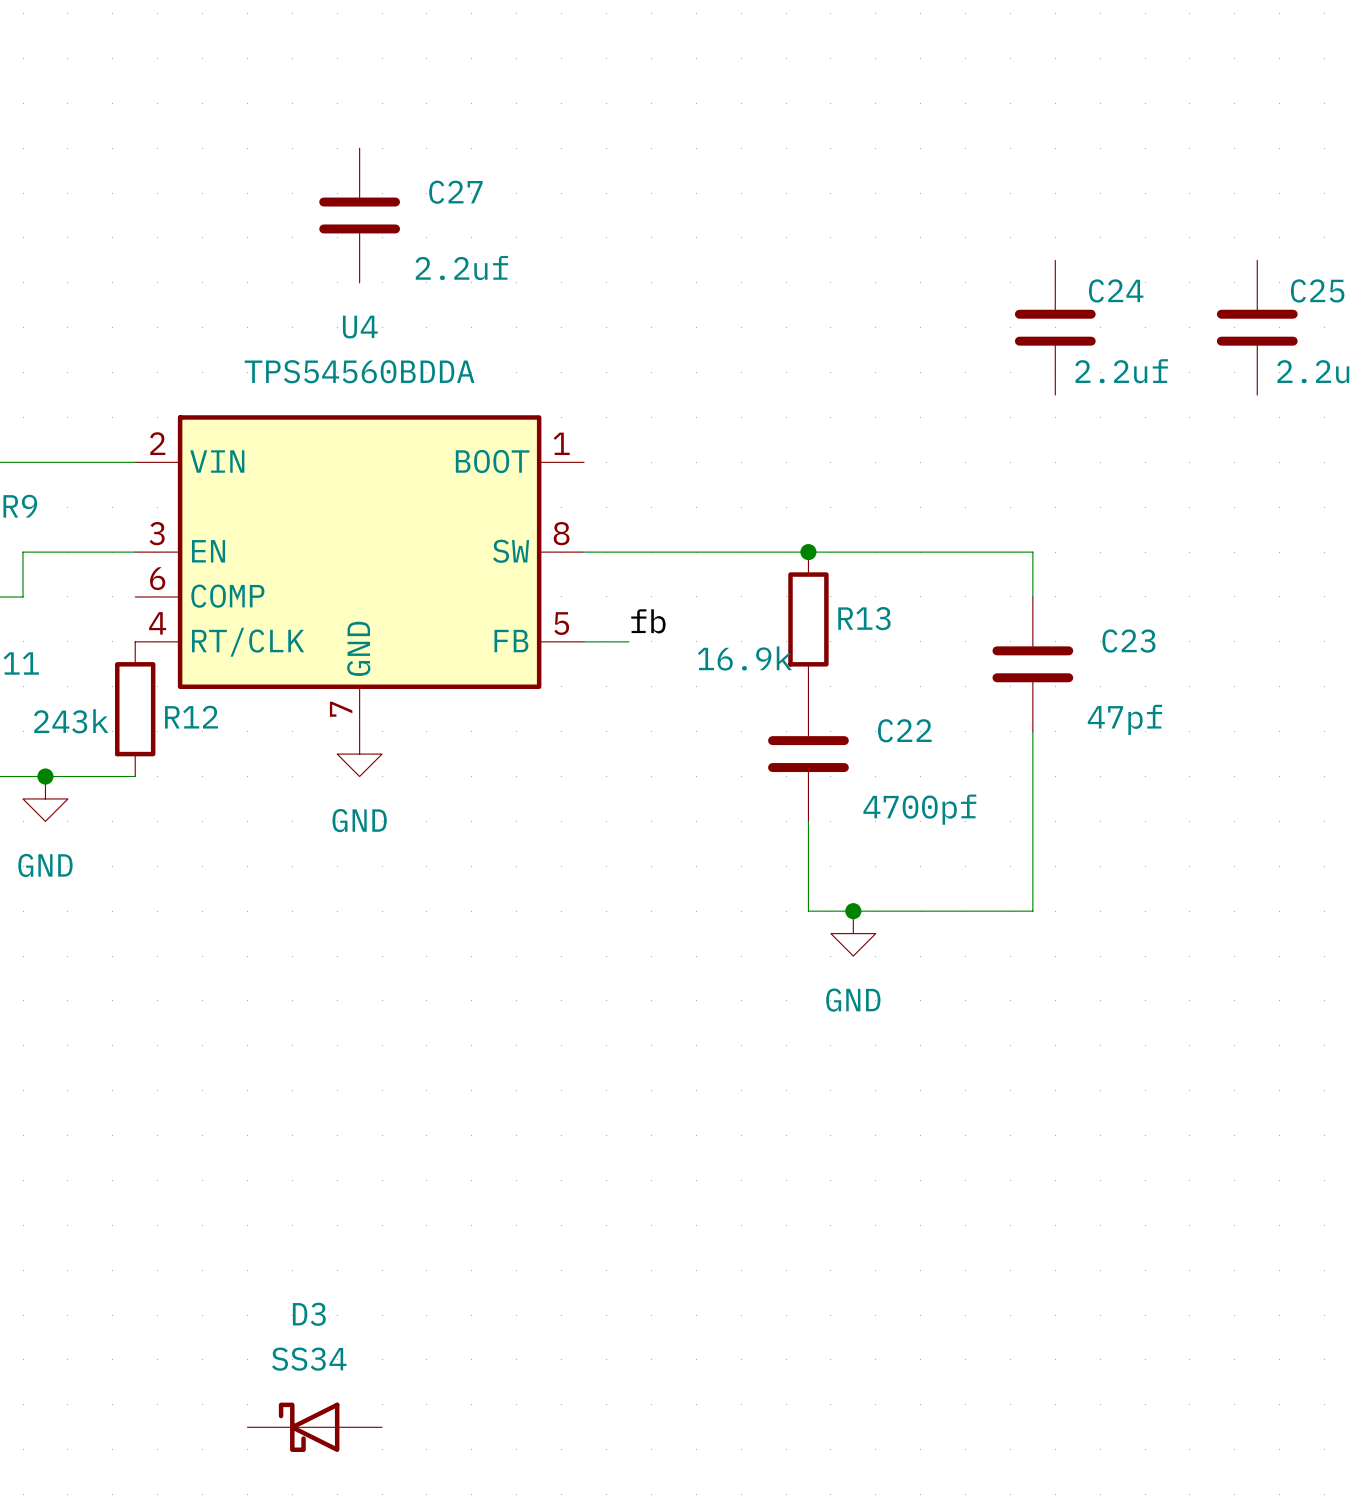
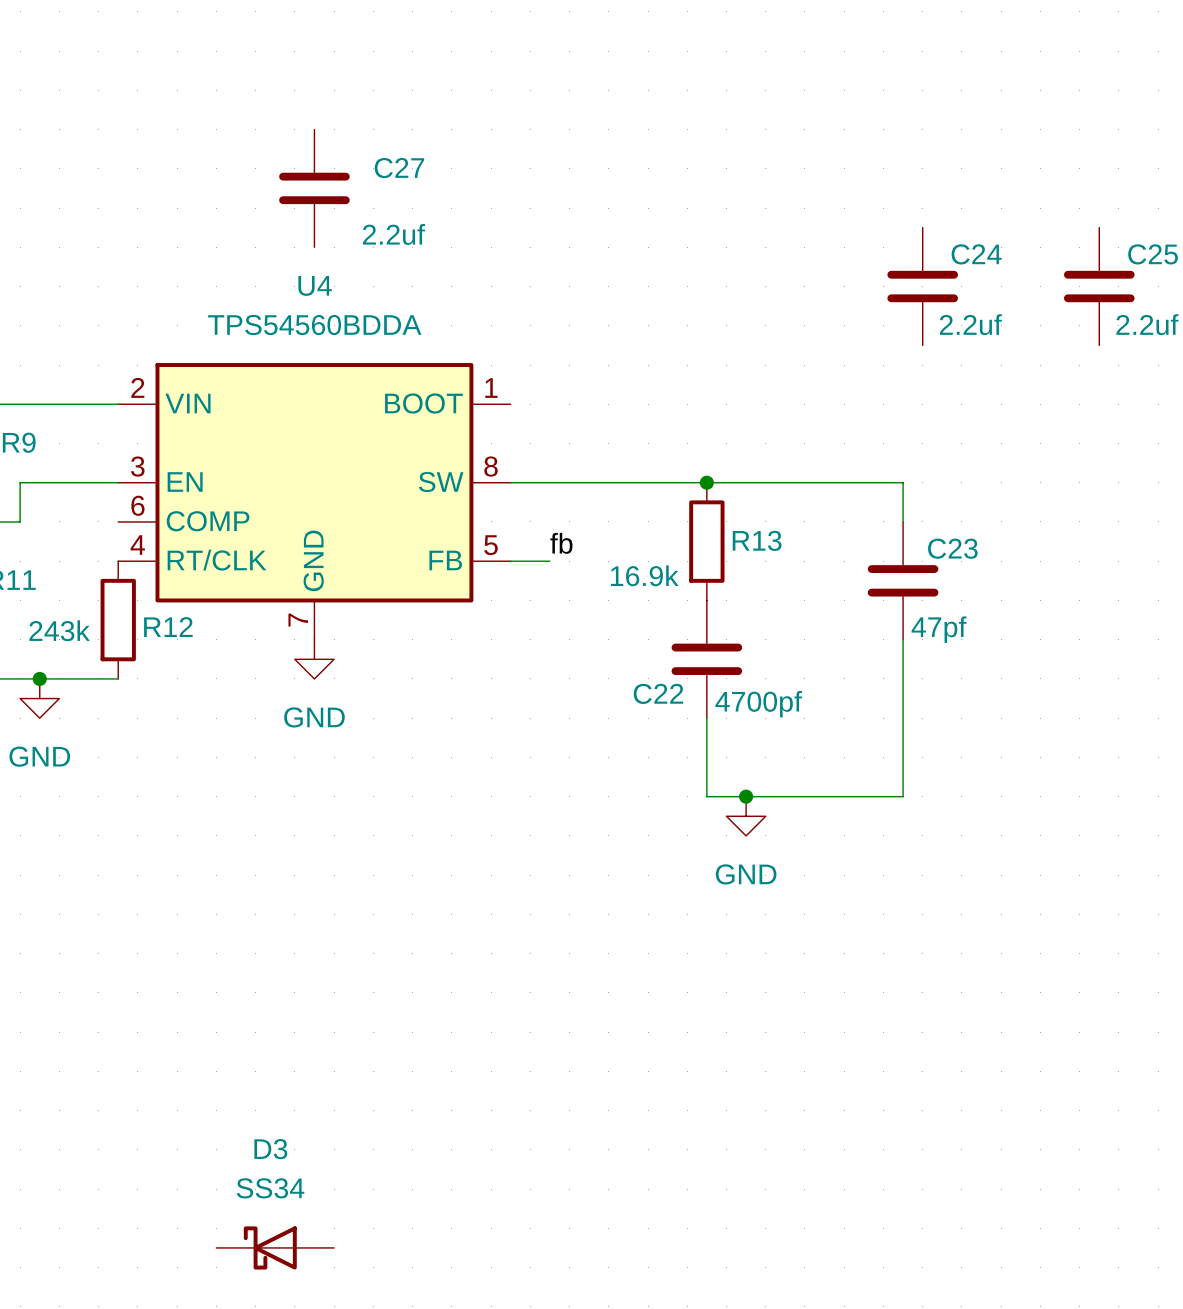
C23 name position: C23 (1128, 641) -> C23 (952, 548)
C23 value position: 47pf (1124, 719) -> 47pf (939, 629)
C22 name position: C22 (904, 730) -> C22 (658, 693)
C22 value position: 4700pf (919, 809) -> 4700pf (758, 704)

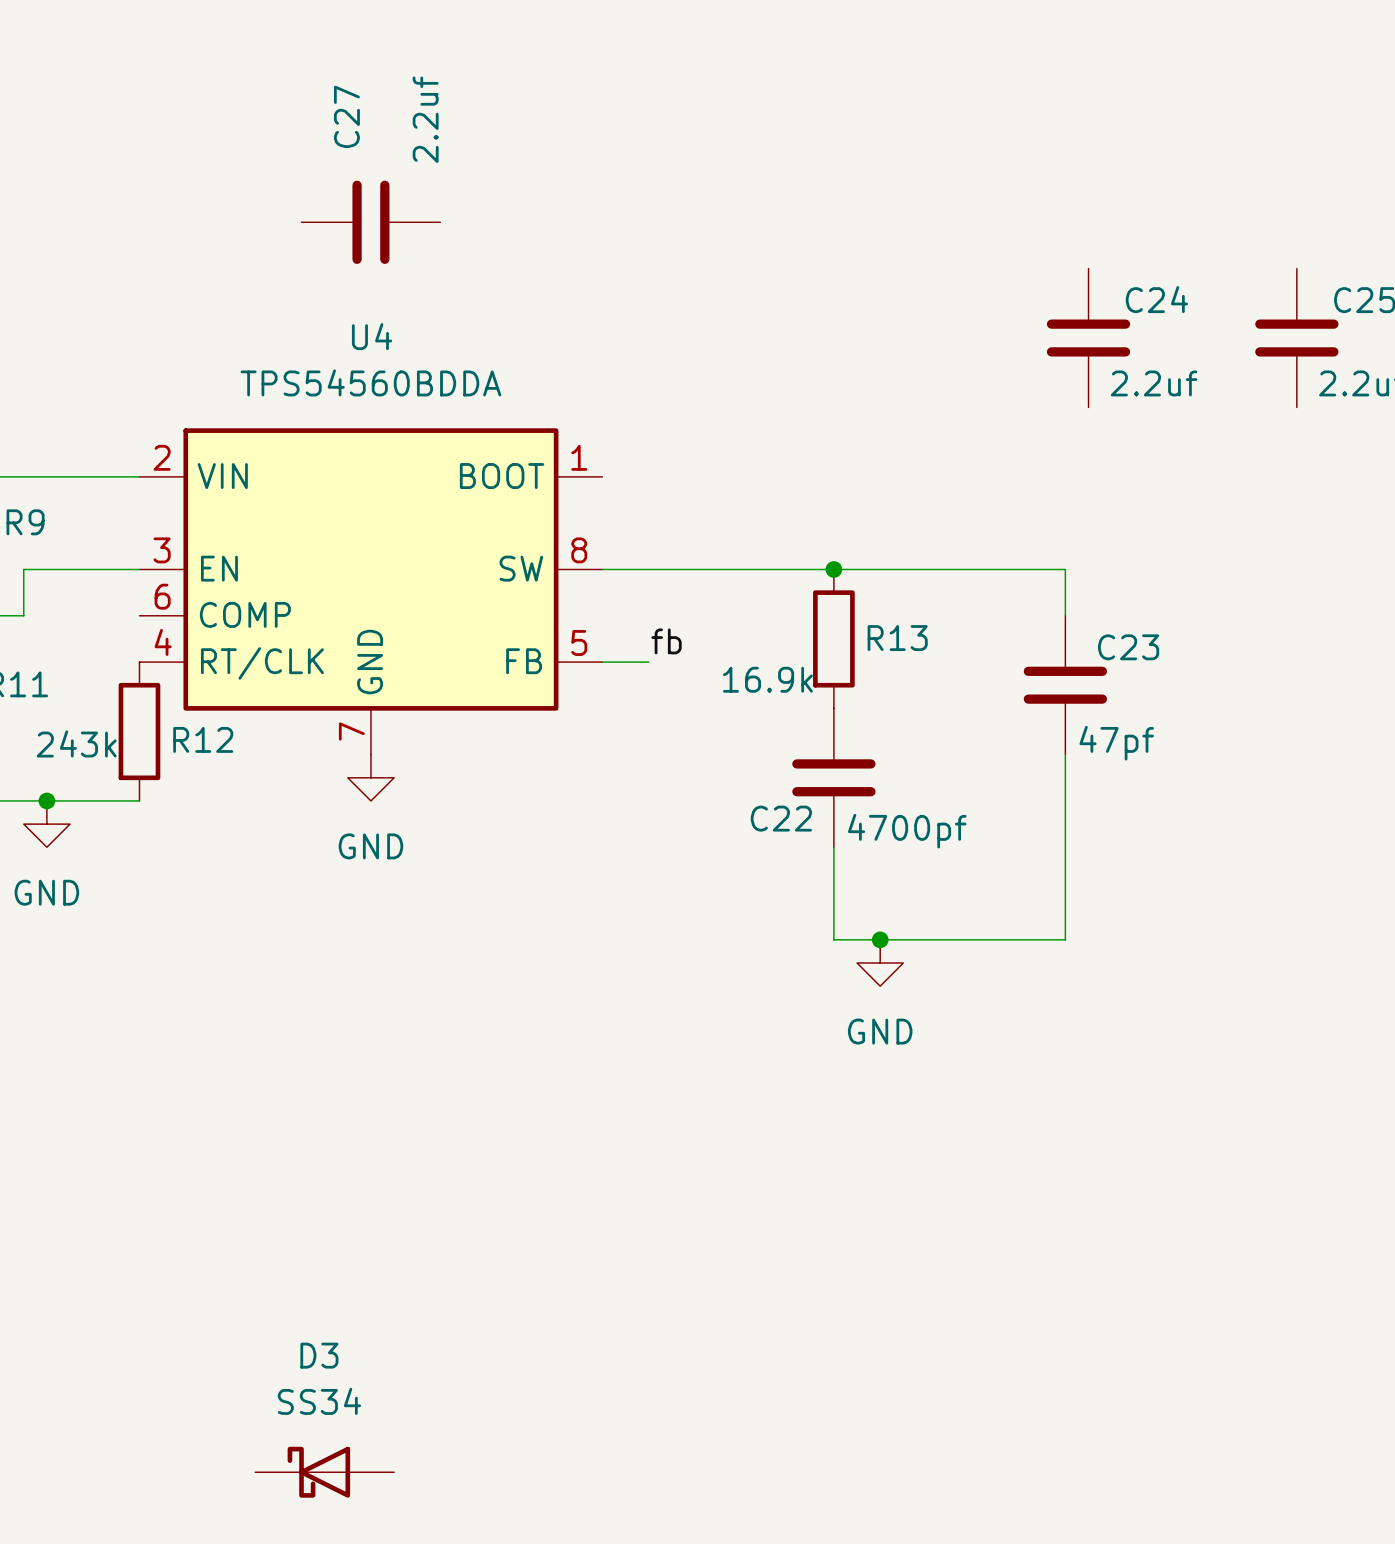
C27 name position: C27 (399, 168) -> C27 (346, 116)
C27 rotation: 0° (314, 188) -> 90° clockwise (370, 222)
C27 value position: 2.2uf (393, 234) -> 2.2uf (425, 119)

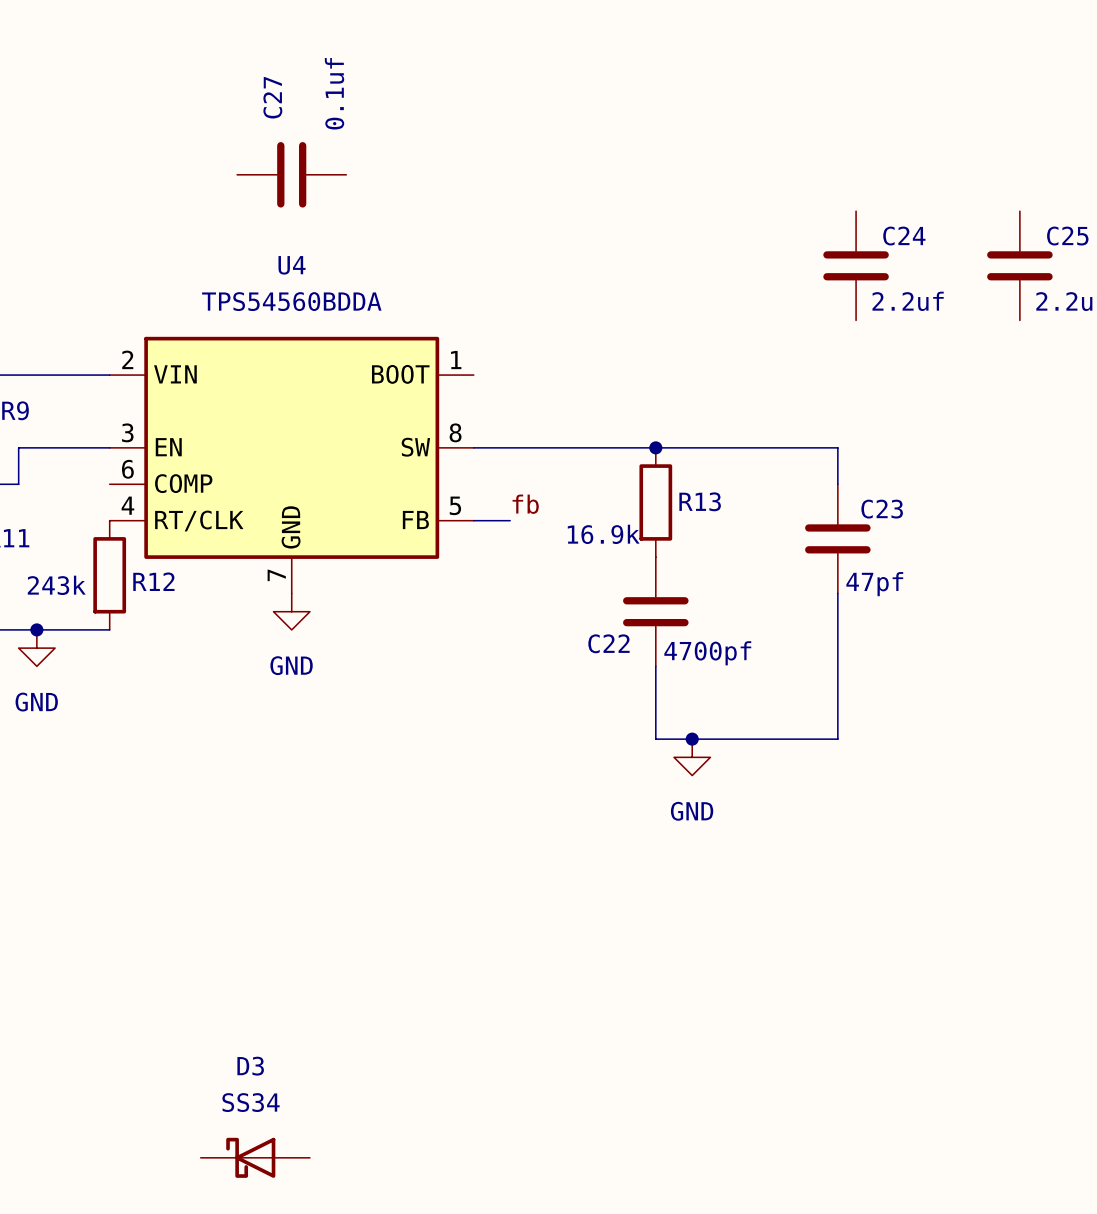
C27 value: 2.2uf (425, 119) -> 0.1uf (334, 93)

